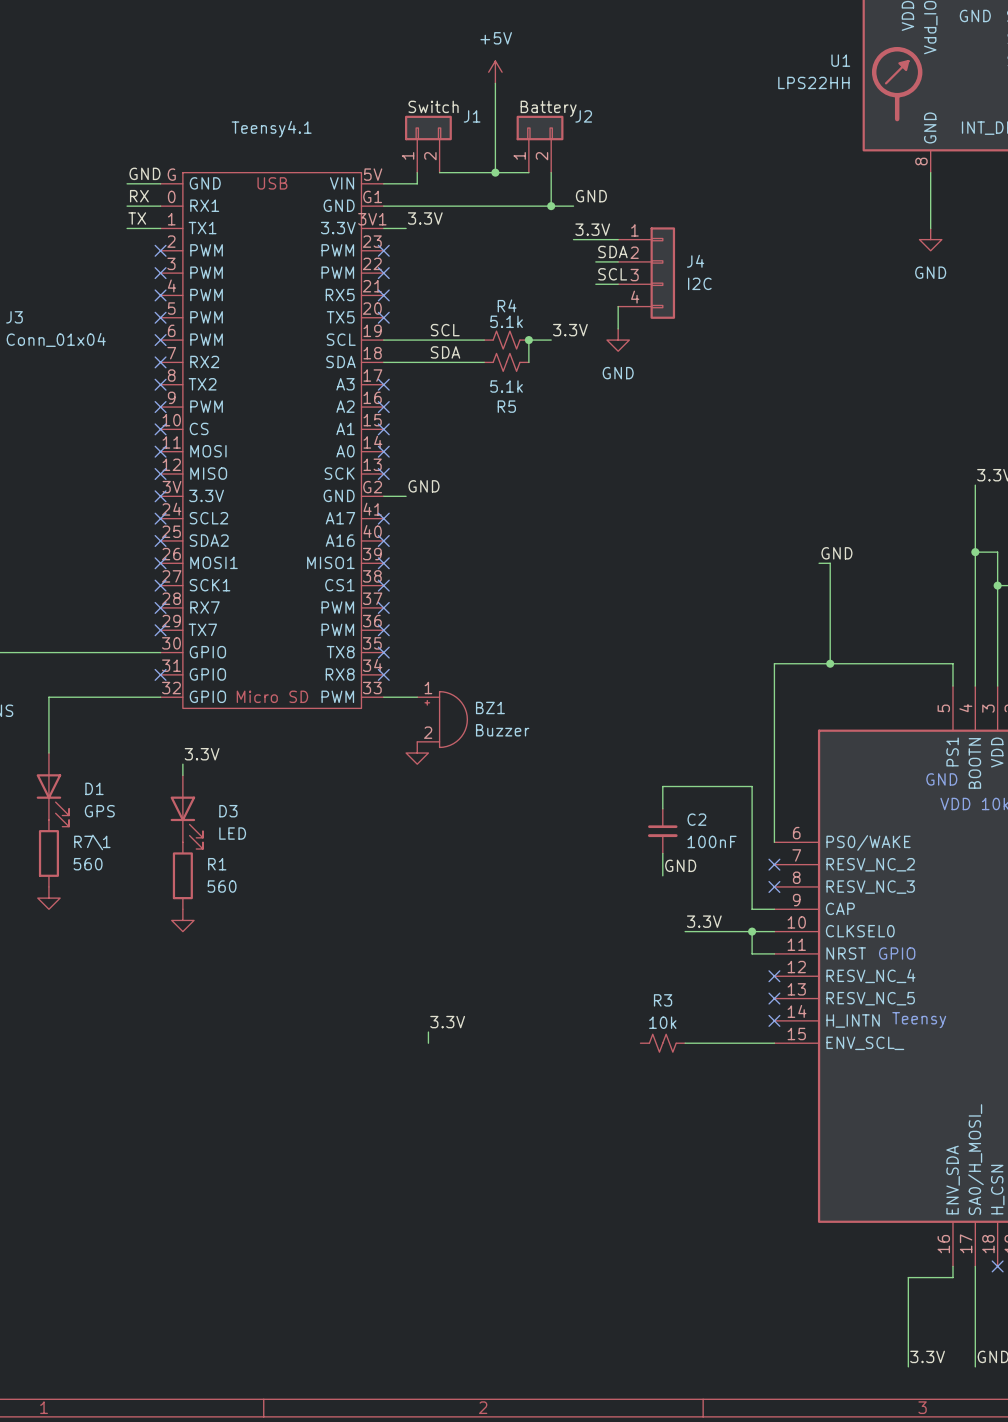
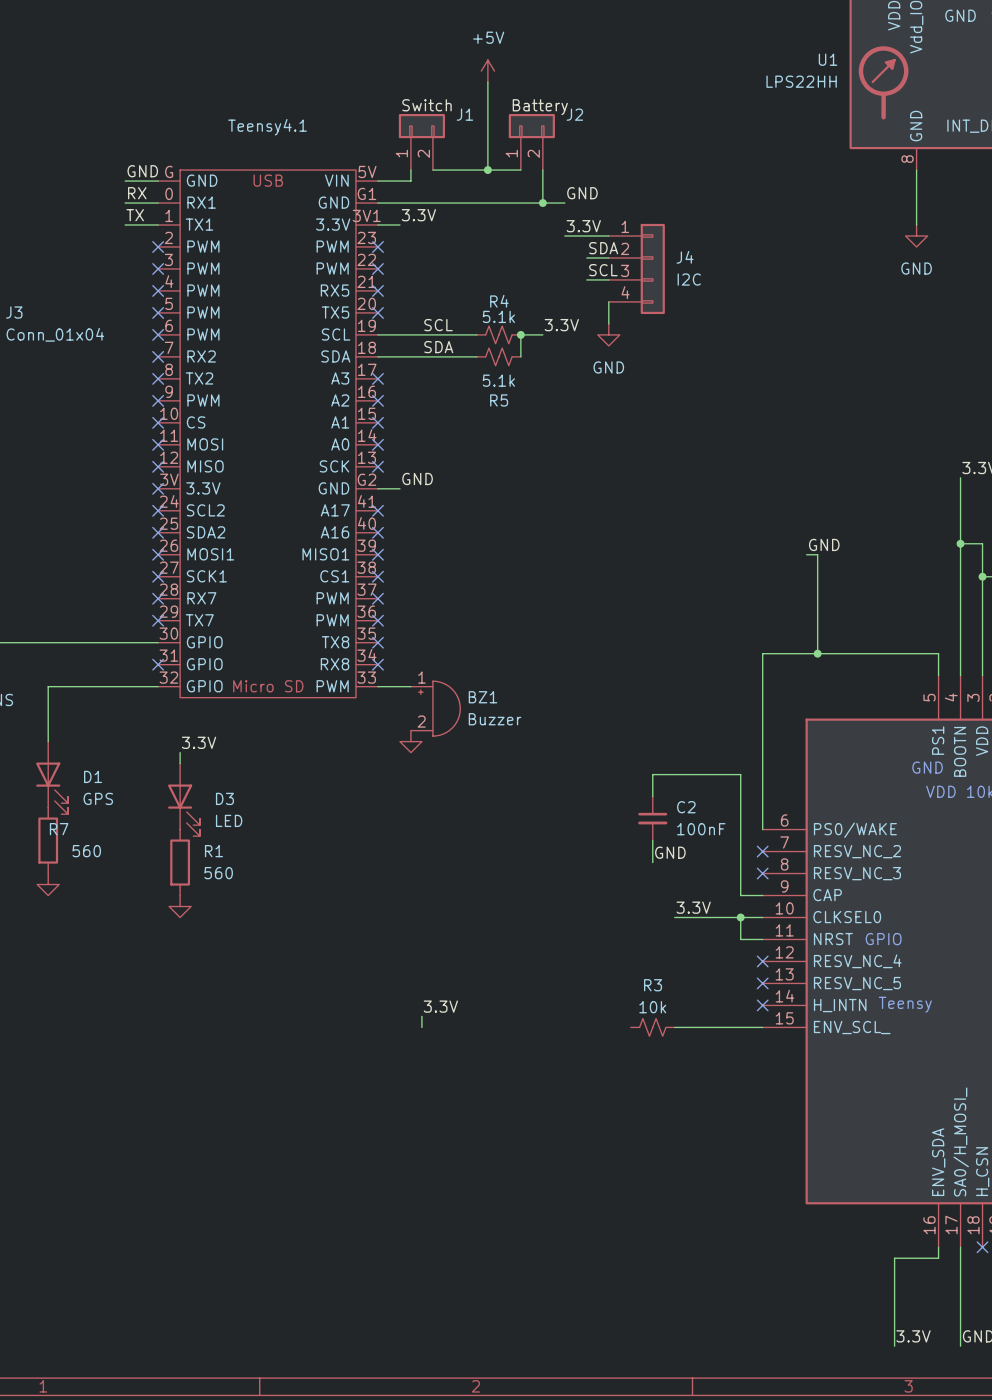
R7\1 name: R7\1 (92, 842) -> R7 (59, 829)

